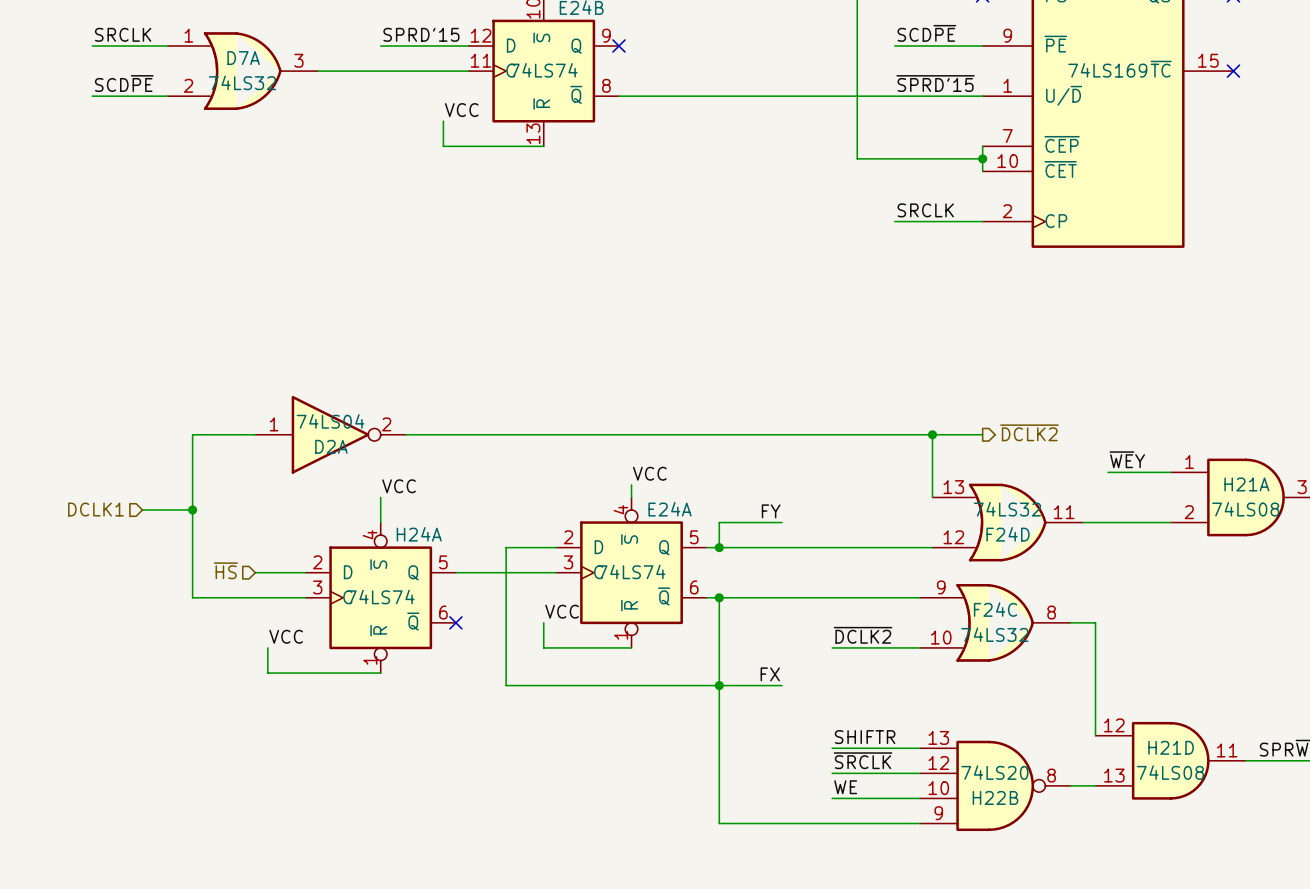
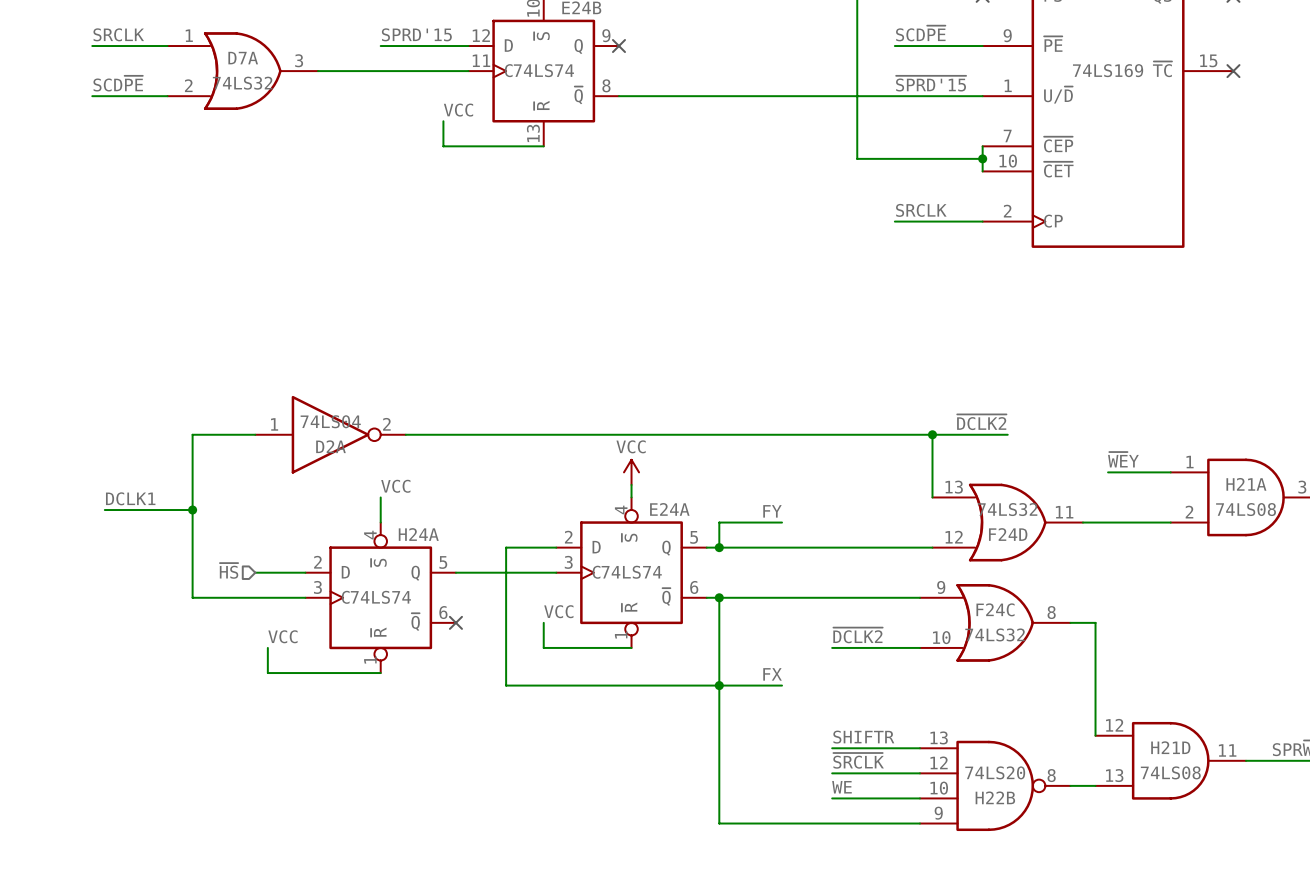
label: none -> ~{DCLK2} (981, 422)
hierarchical label: ~{DCLK2} (1029, 432) -> none
wire: none -> (982, 434) (1007, 434)
power symbol: none -> VCC (631, 472)
label: VCC (649, 473) -> none
label: none -> DCLK1 (130, 498)
hierarchical label: DCLK1 (95, 509) -> none
wire: none -> (104, 510) (142, 510)

